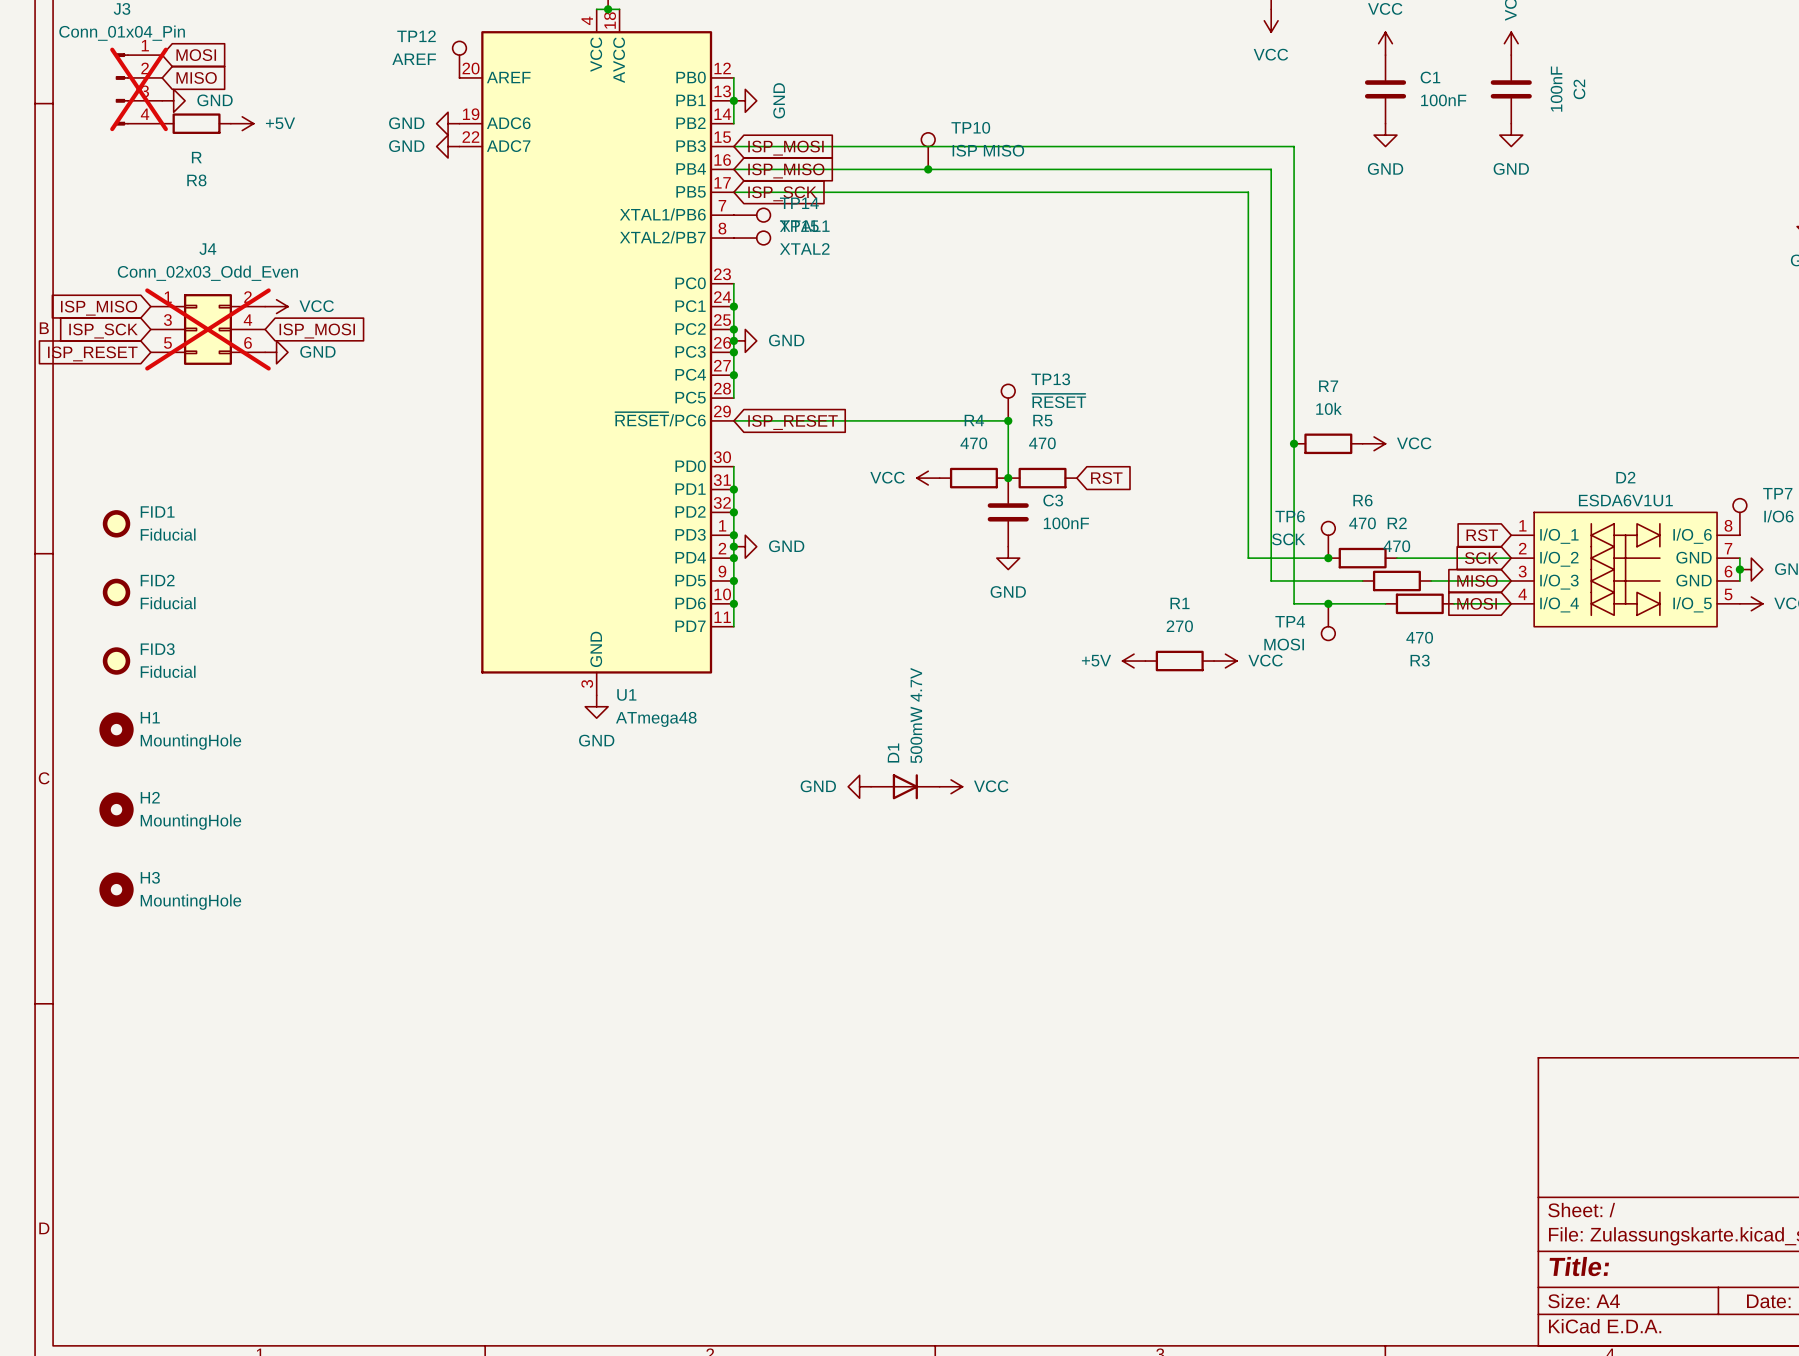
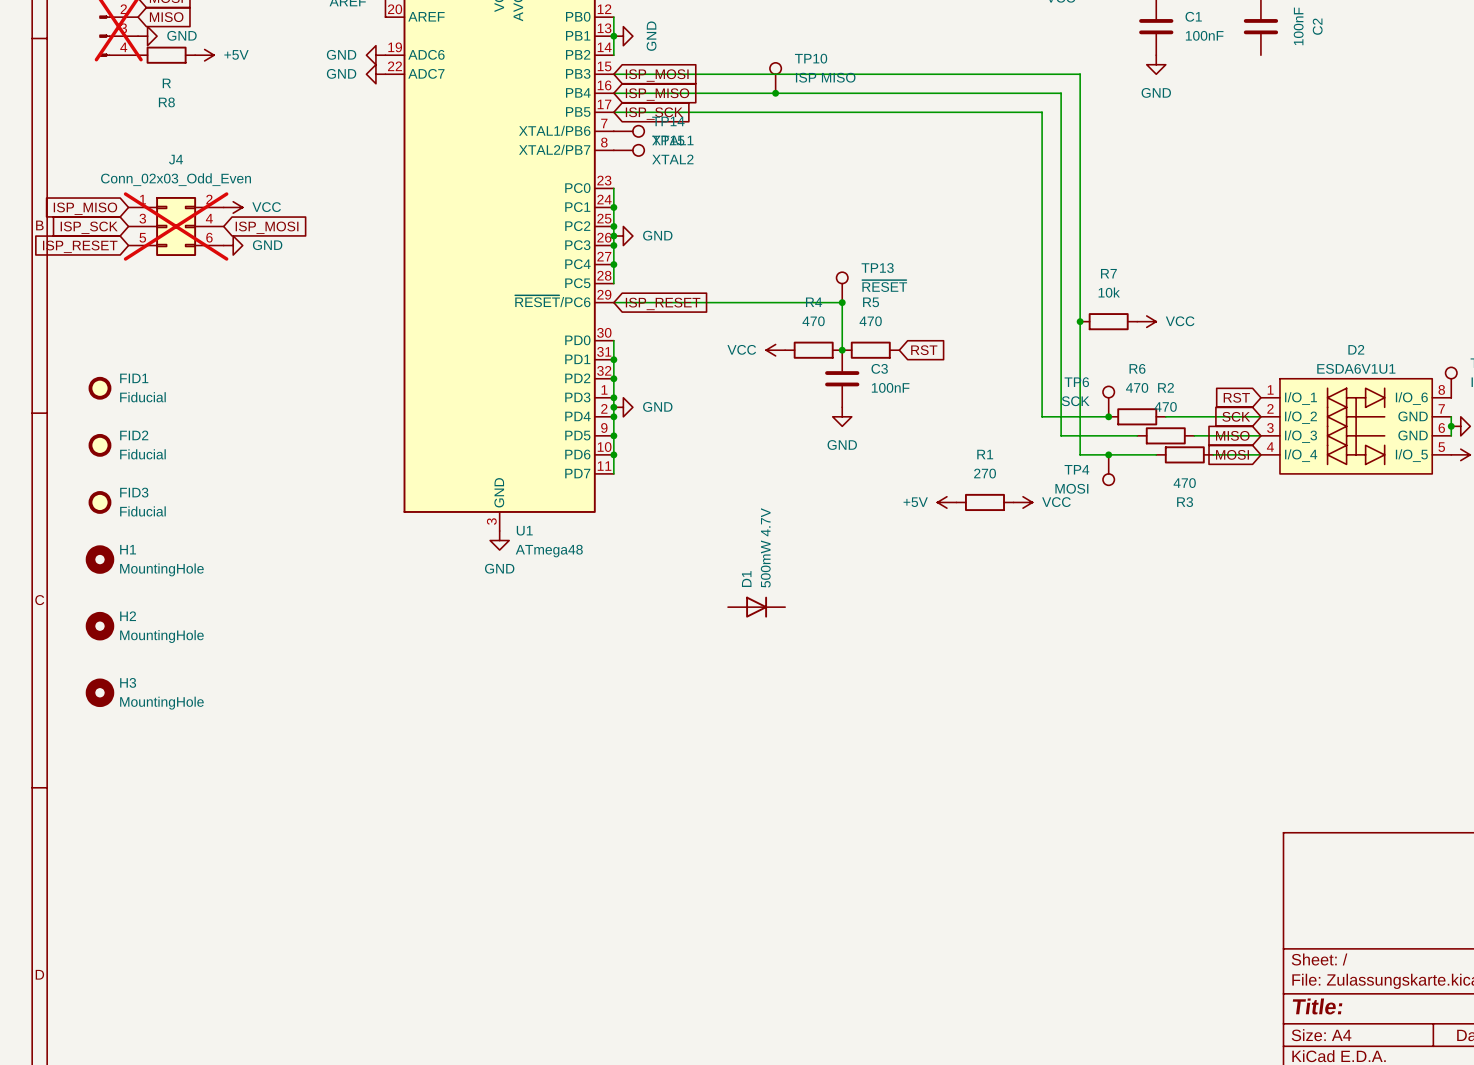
power symbol: GND (1511, 135) -> none
power symbol: GND (859, 786) -> none
power symbol: VCC (951, 786) -> none

